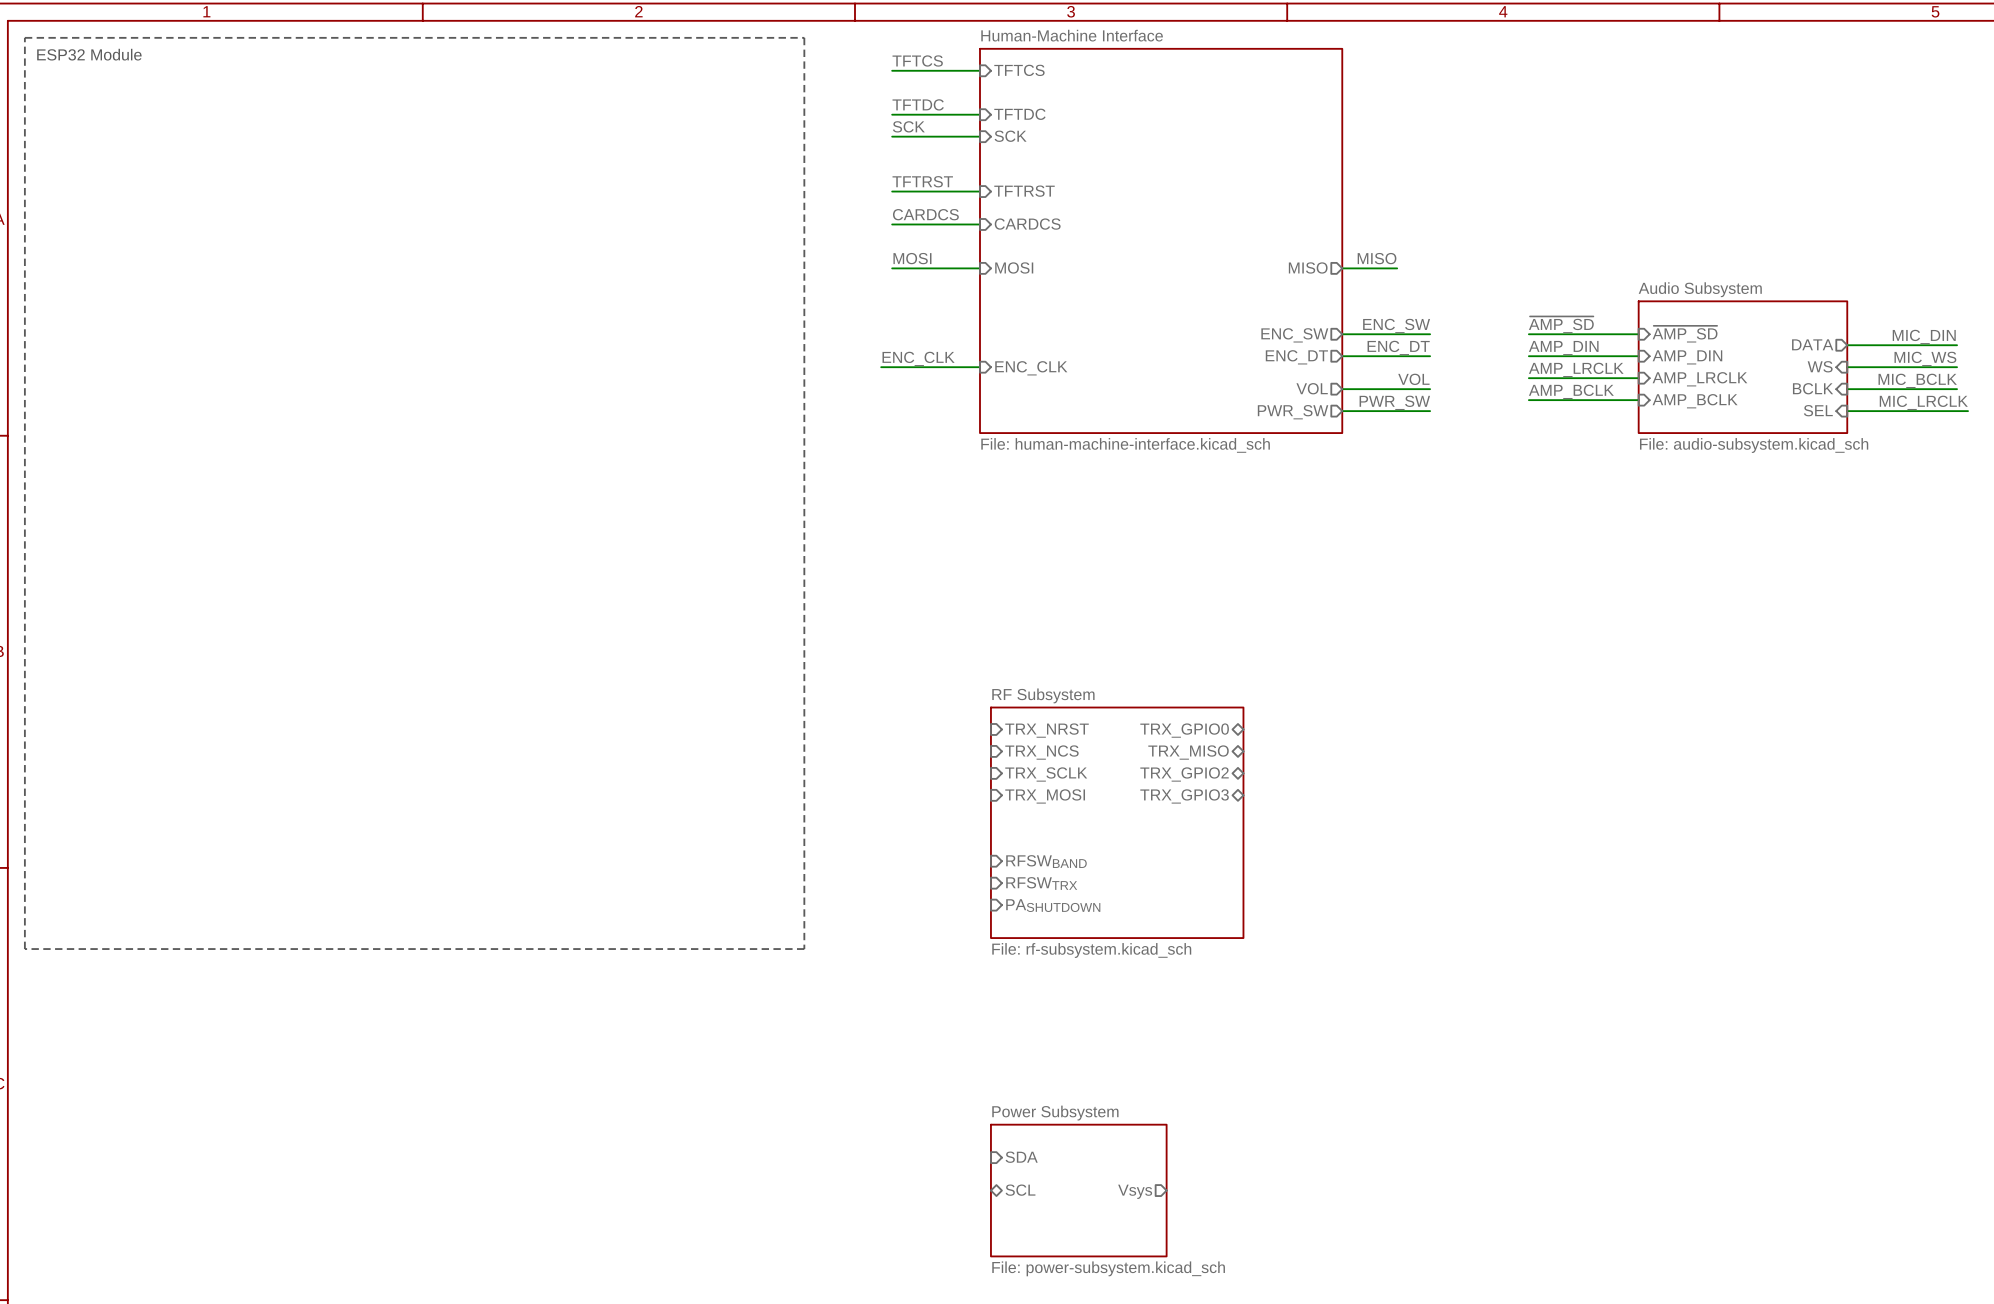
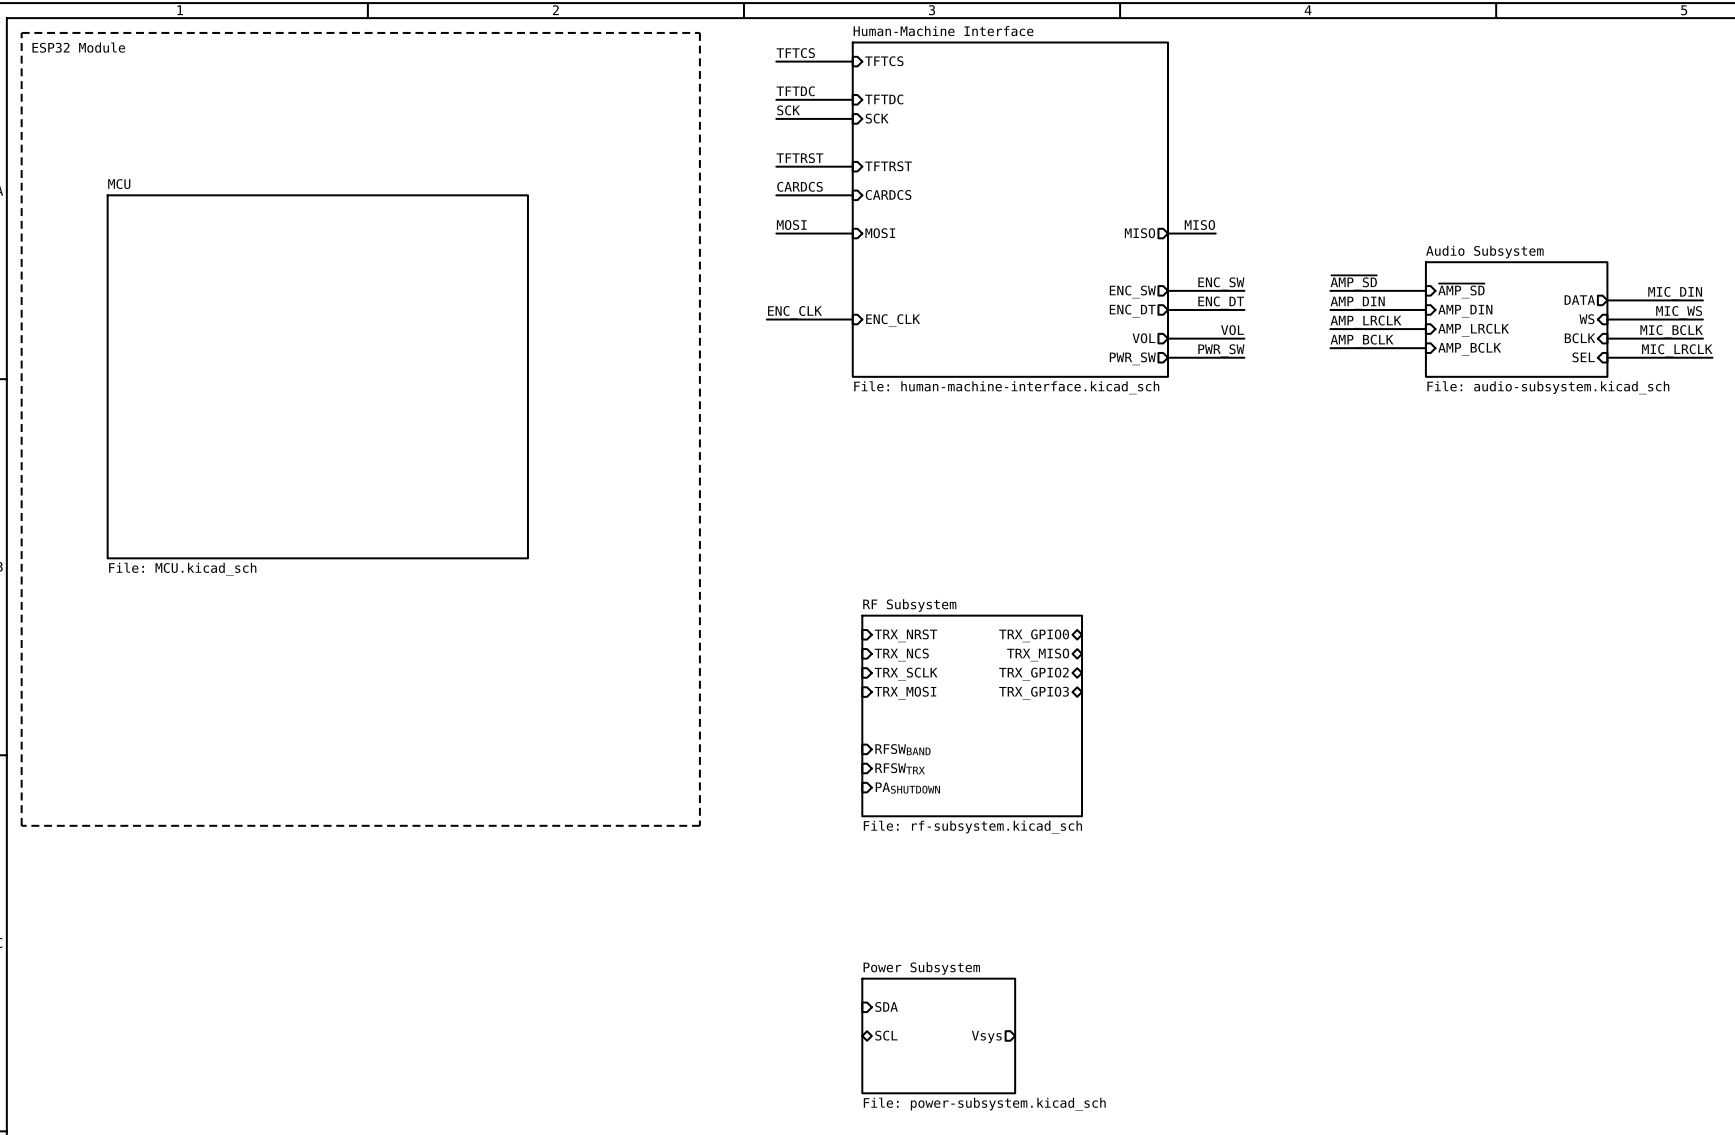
sheet MCU: none -> File: MCU.kicad_sch (317, 376)

